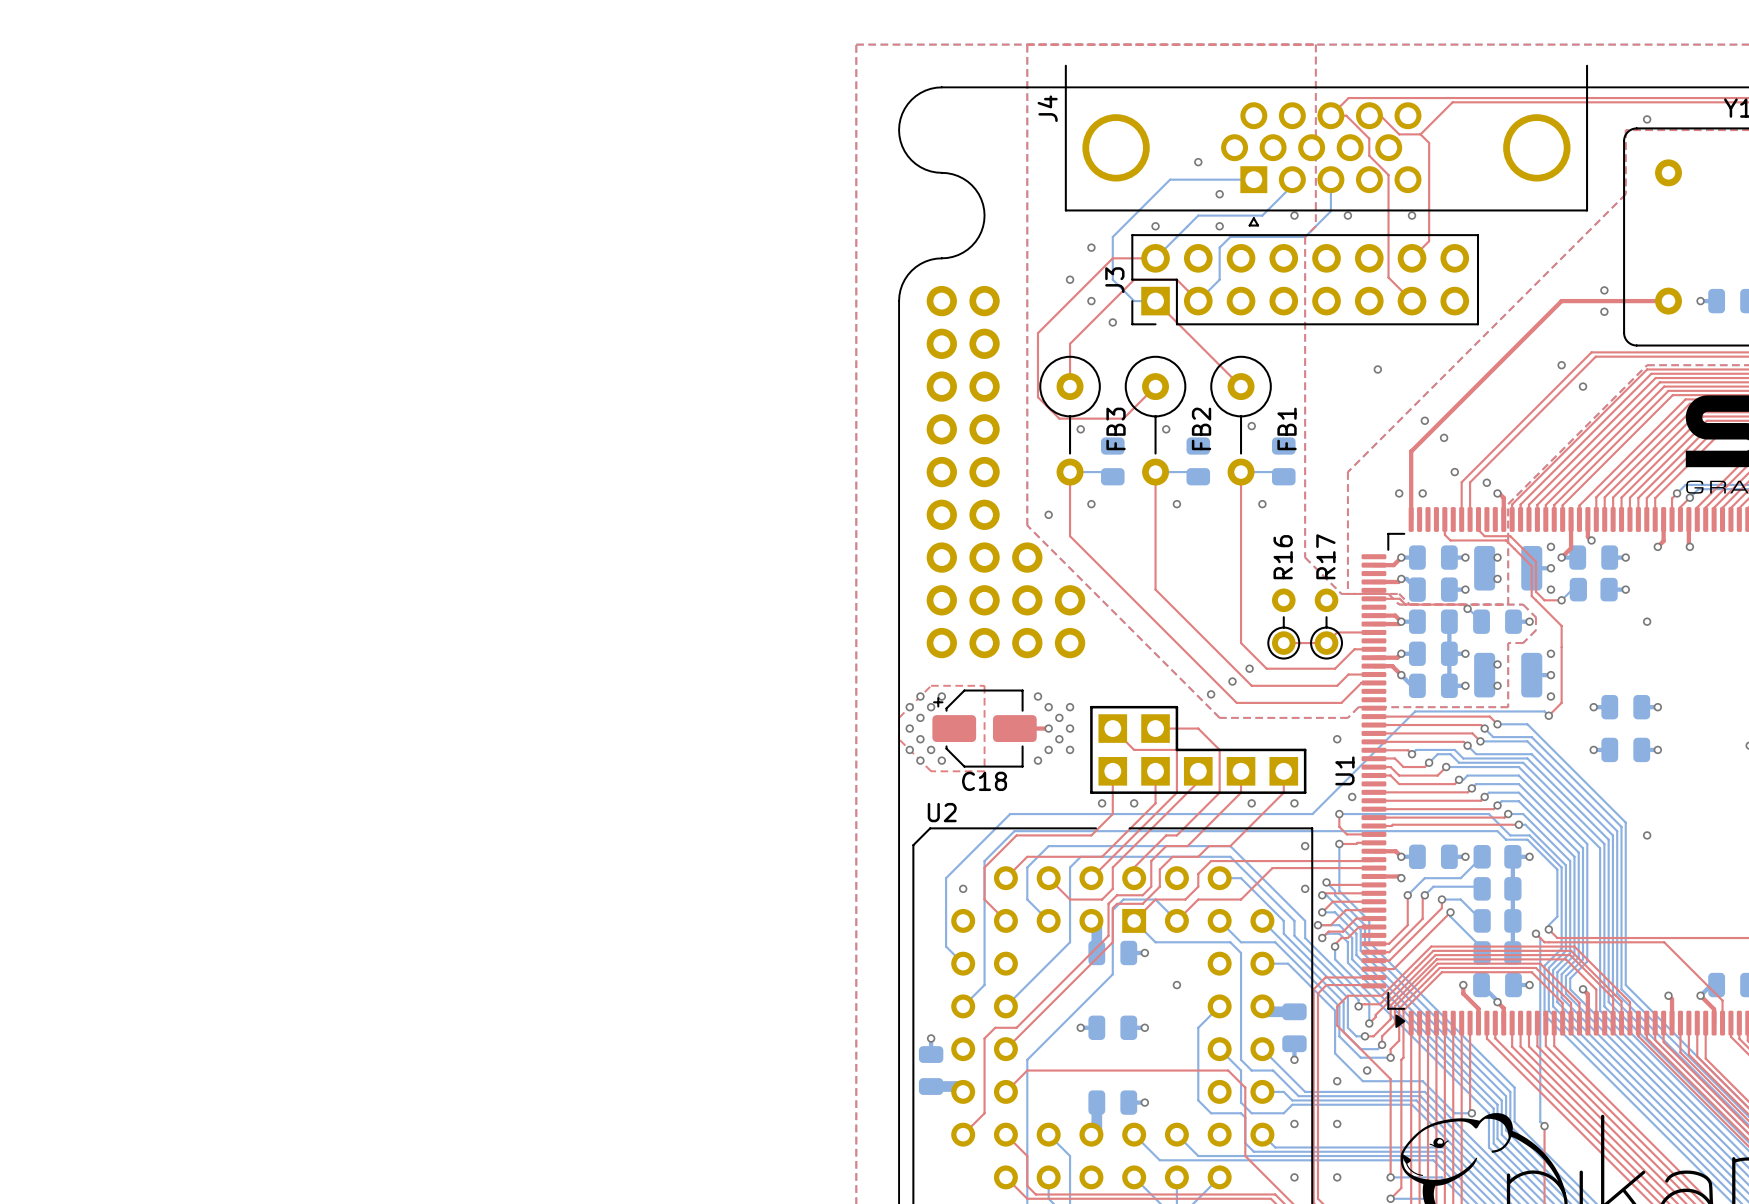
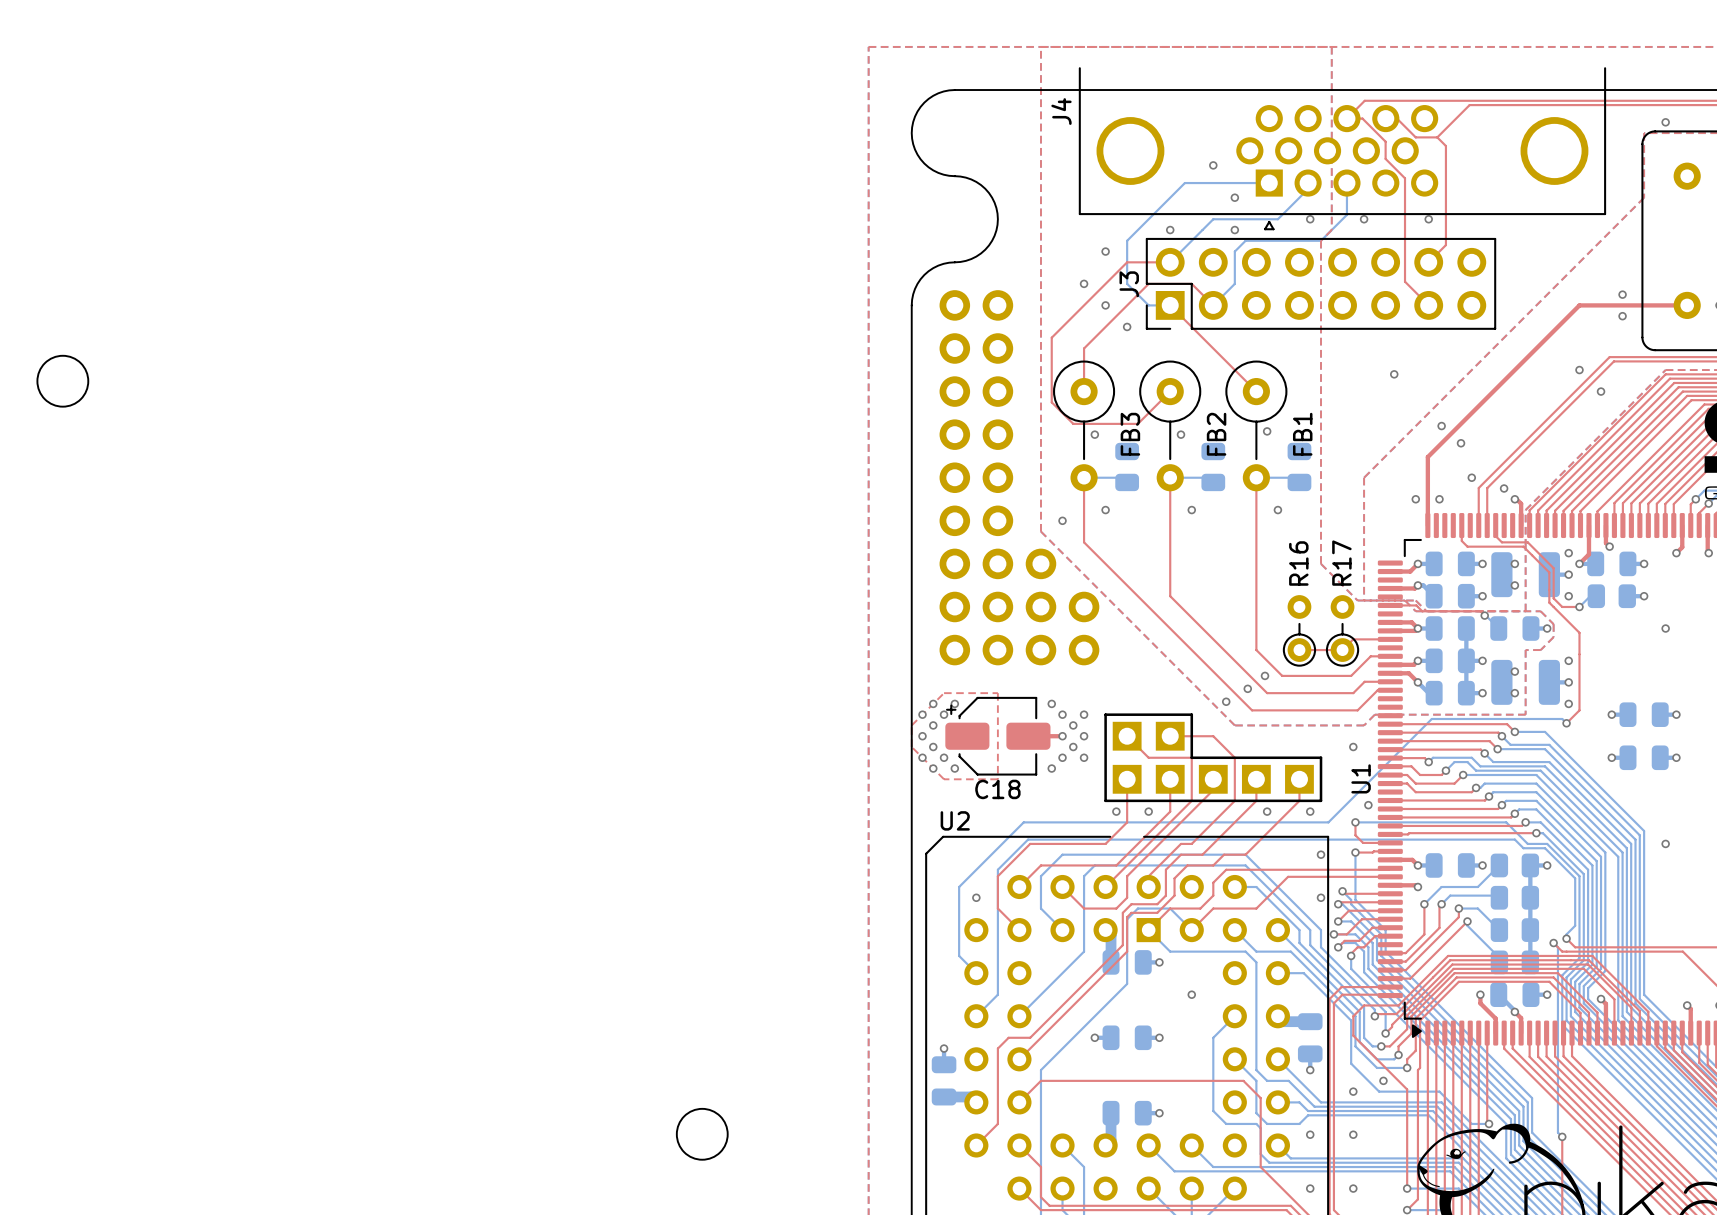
round board edge: none -> [36, 354, 90, 408]
round board edge: none -> [675, 1108, 729, 1161]

